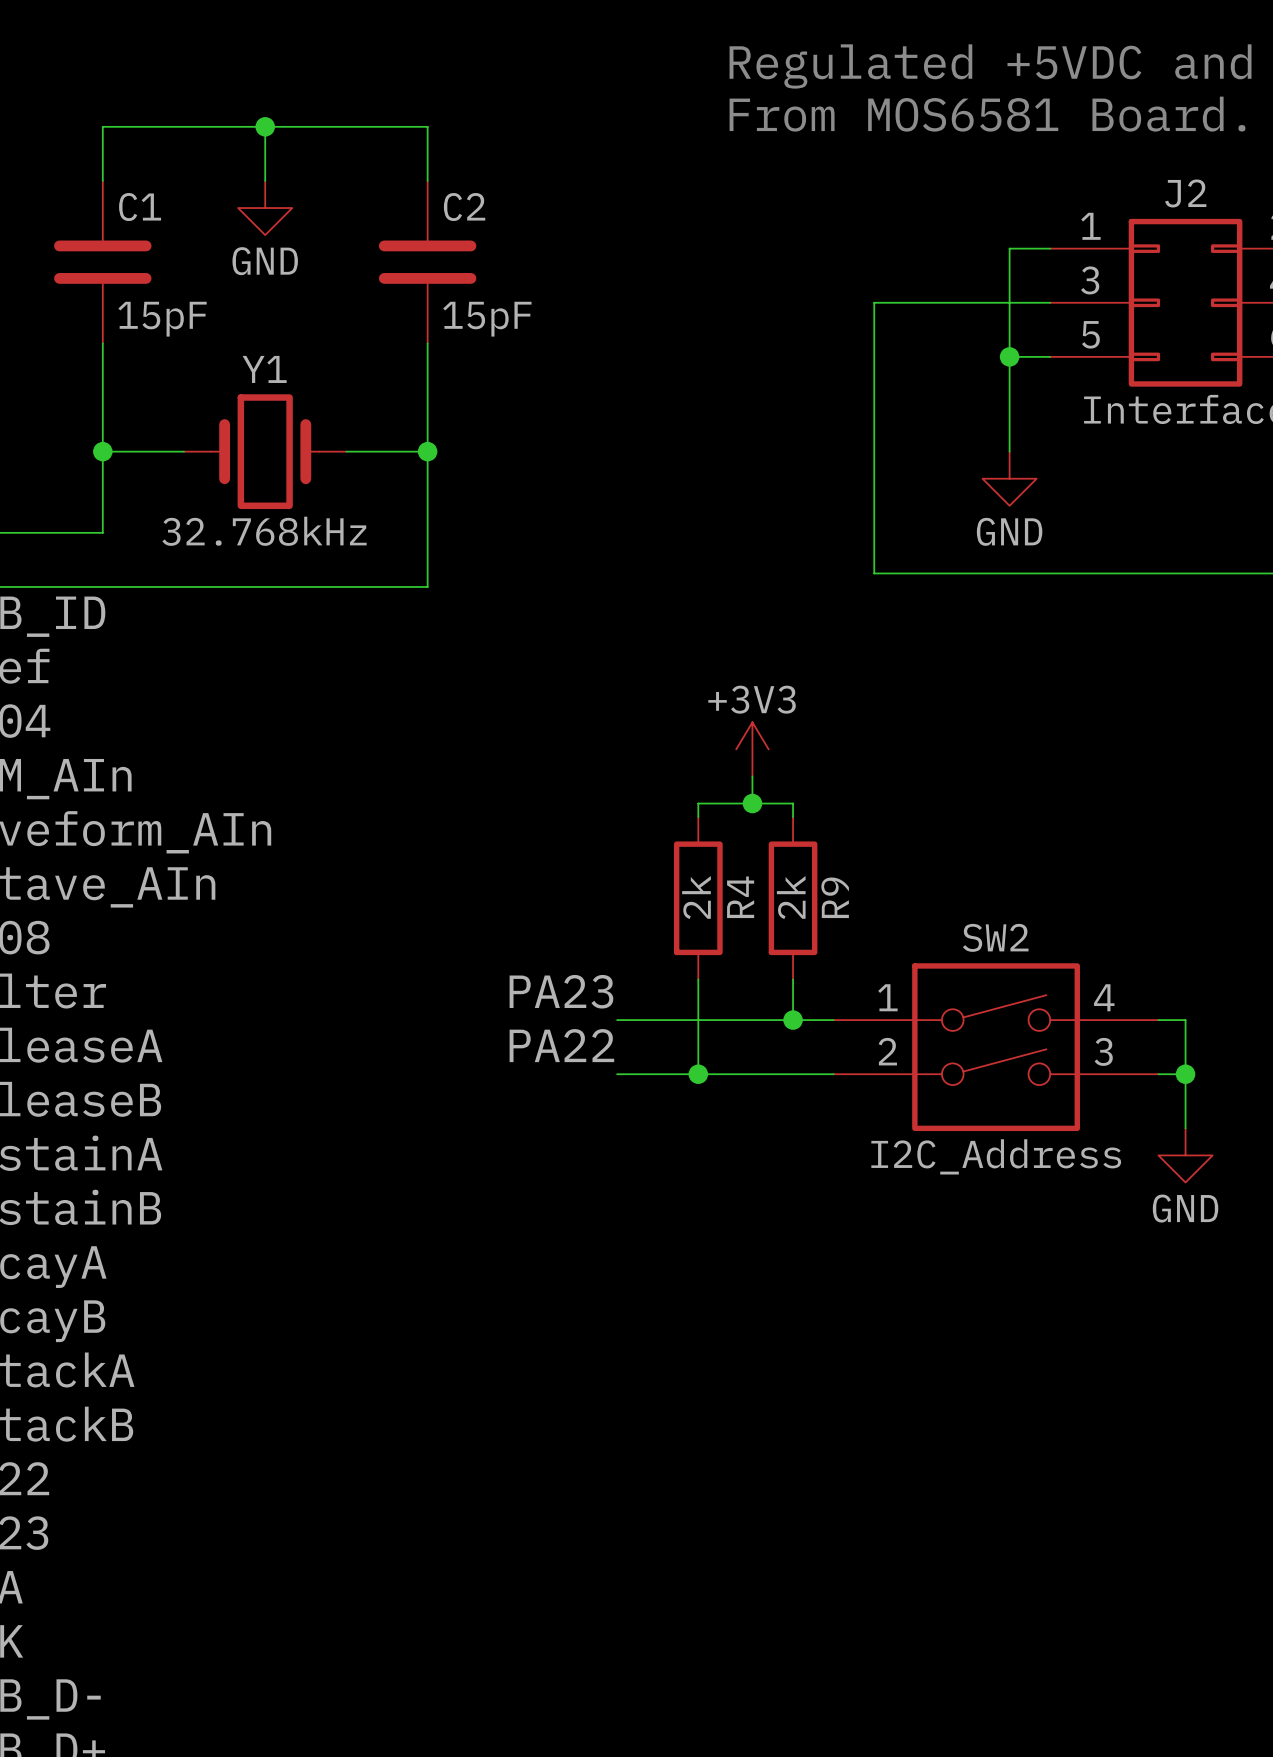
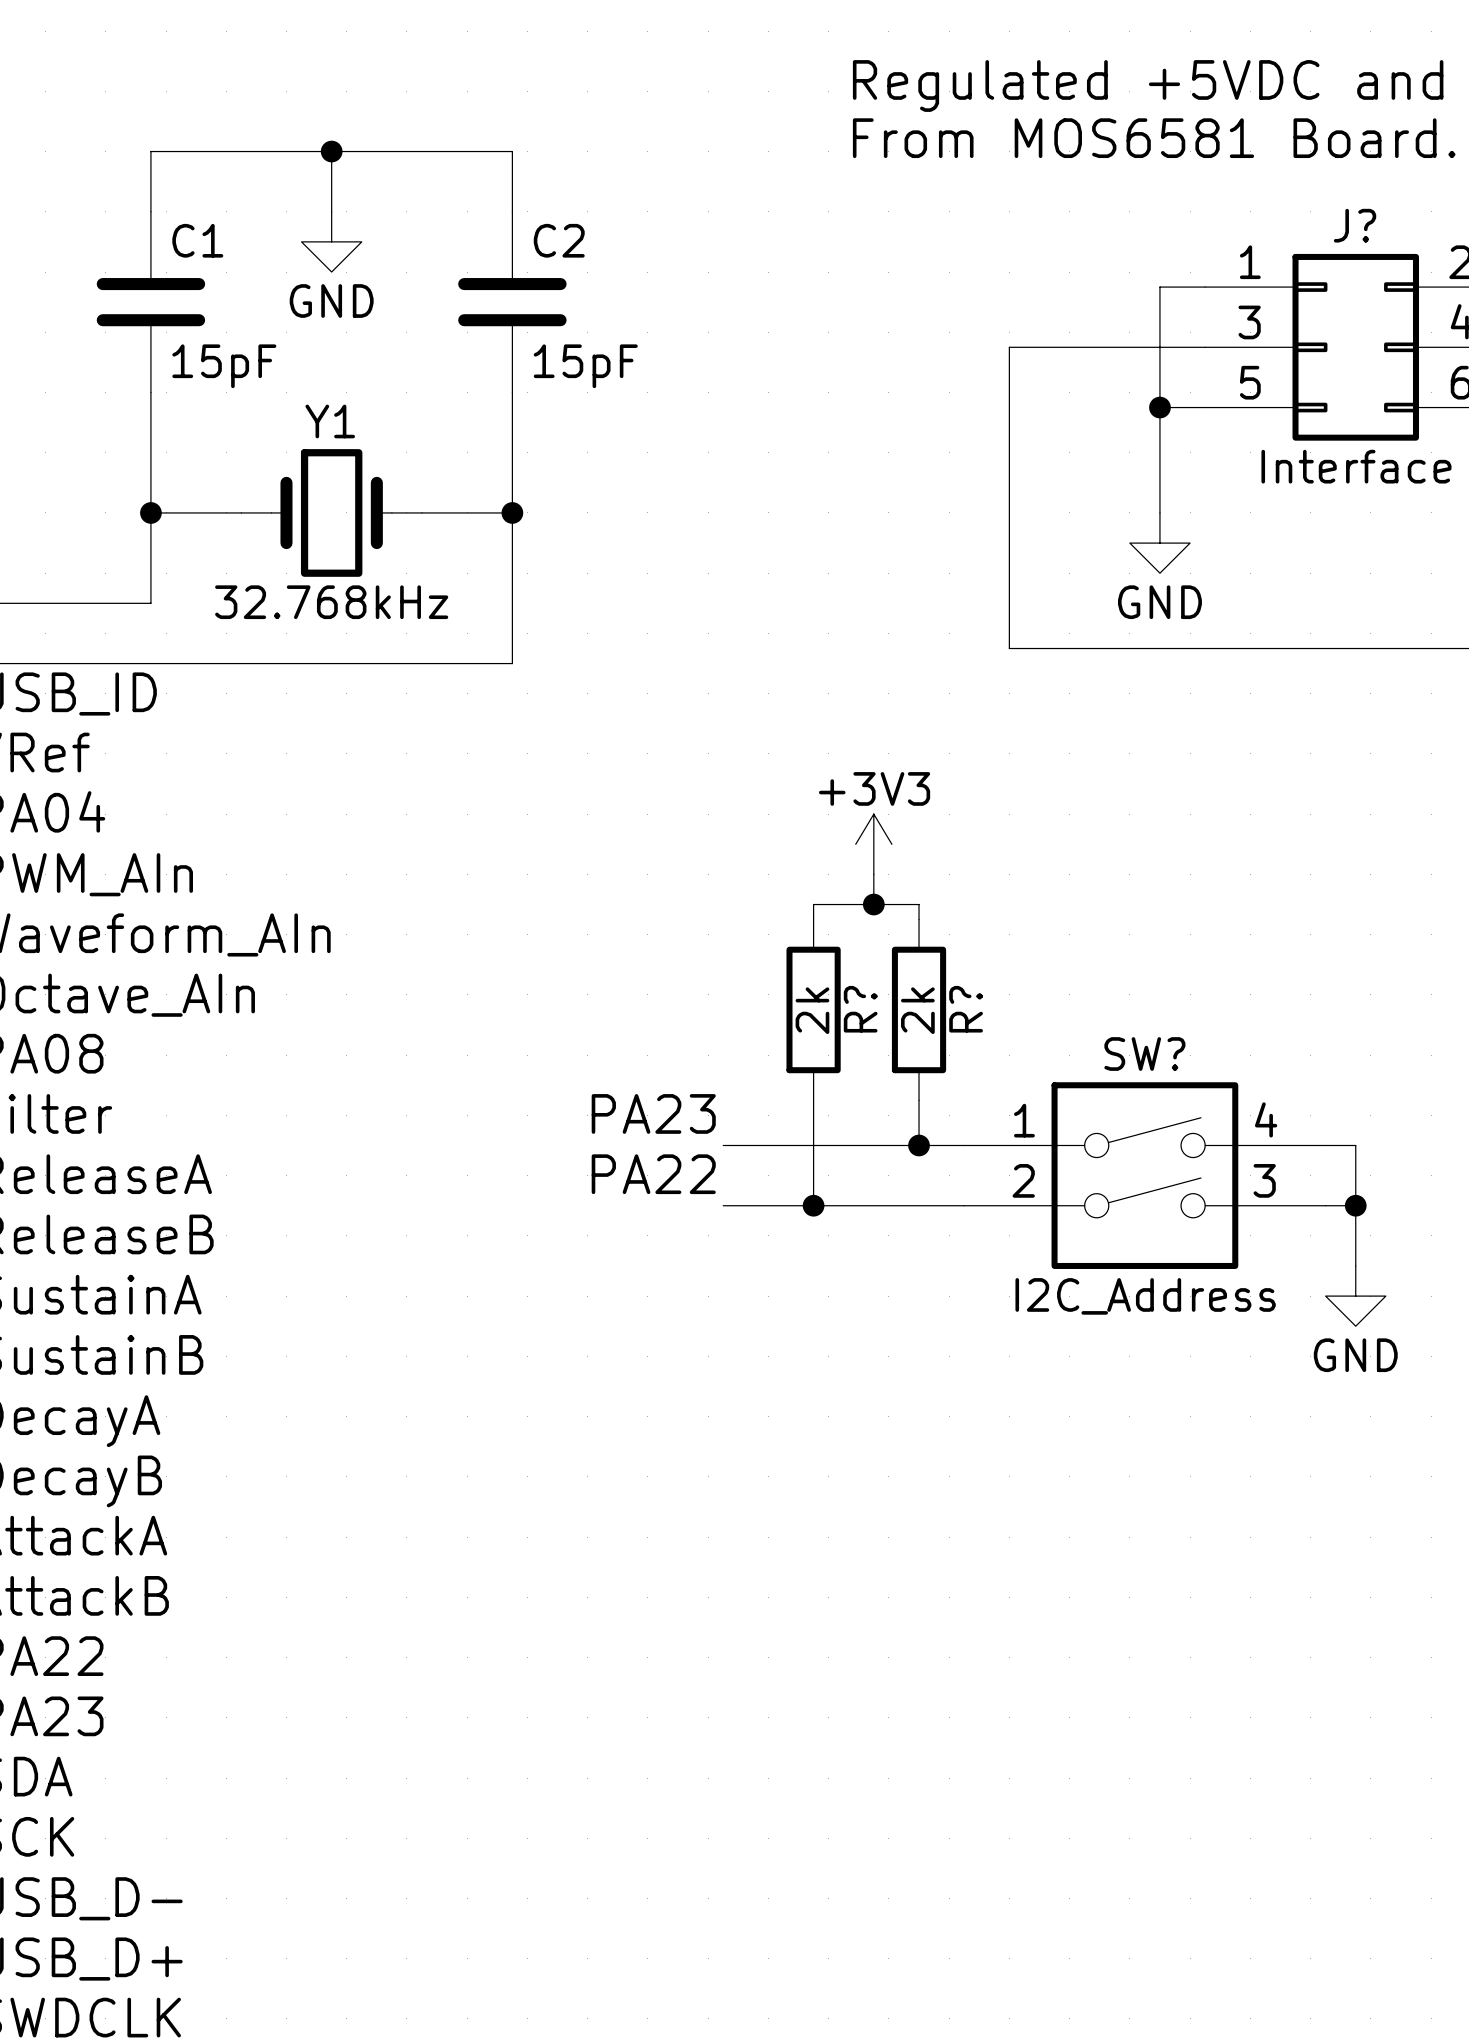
J2 name: J2 (1185, 193) -> J? (1355, 225)
R4 name: R4 (740, 897) -> R? (860, 1009)
R9 name: R9 (835, 897) -> R? (966, 1009)
SW2 name: SW2 (995, 937) -> SW? (1144, 1054)

